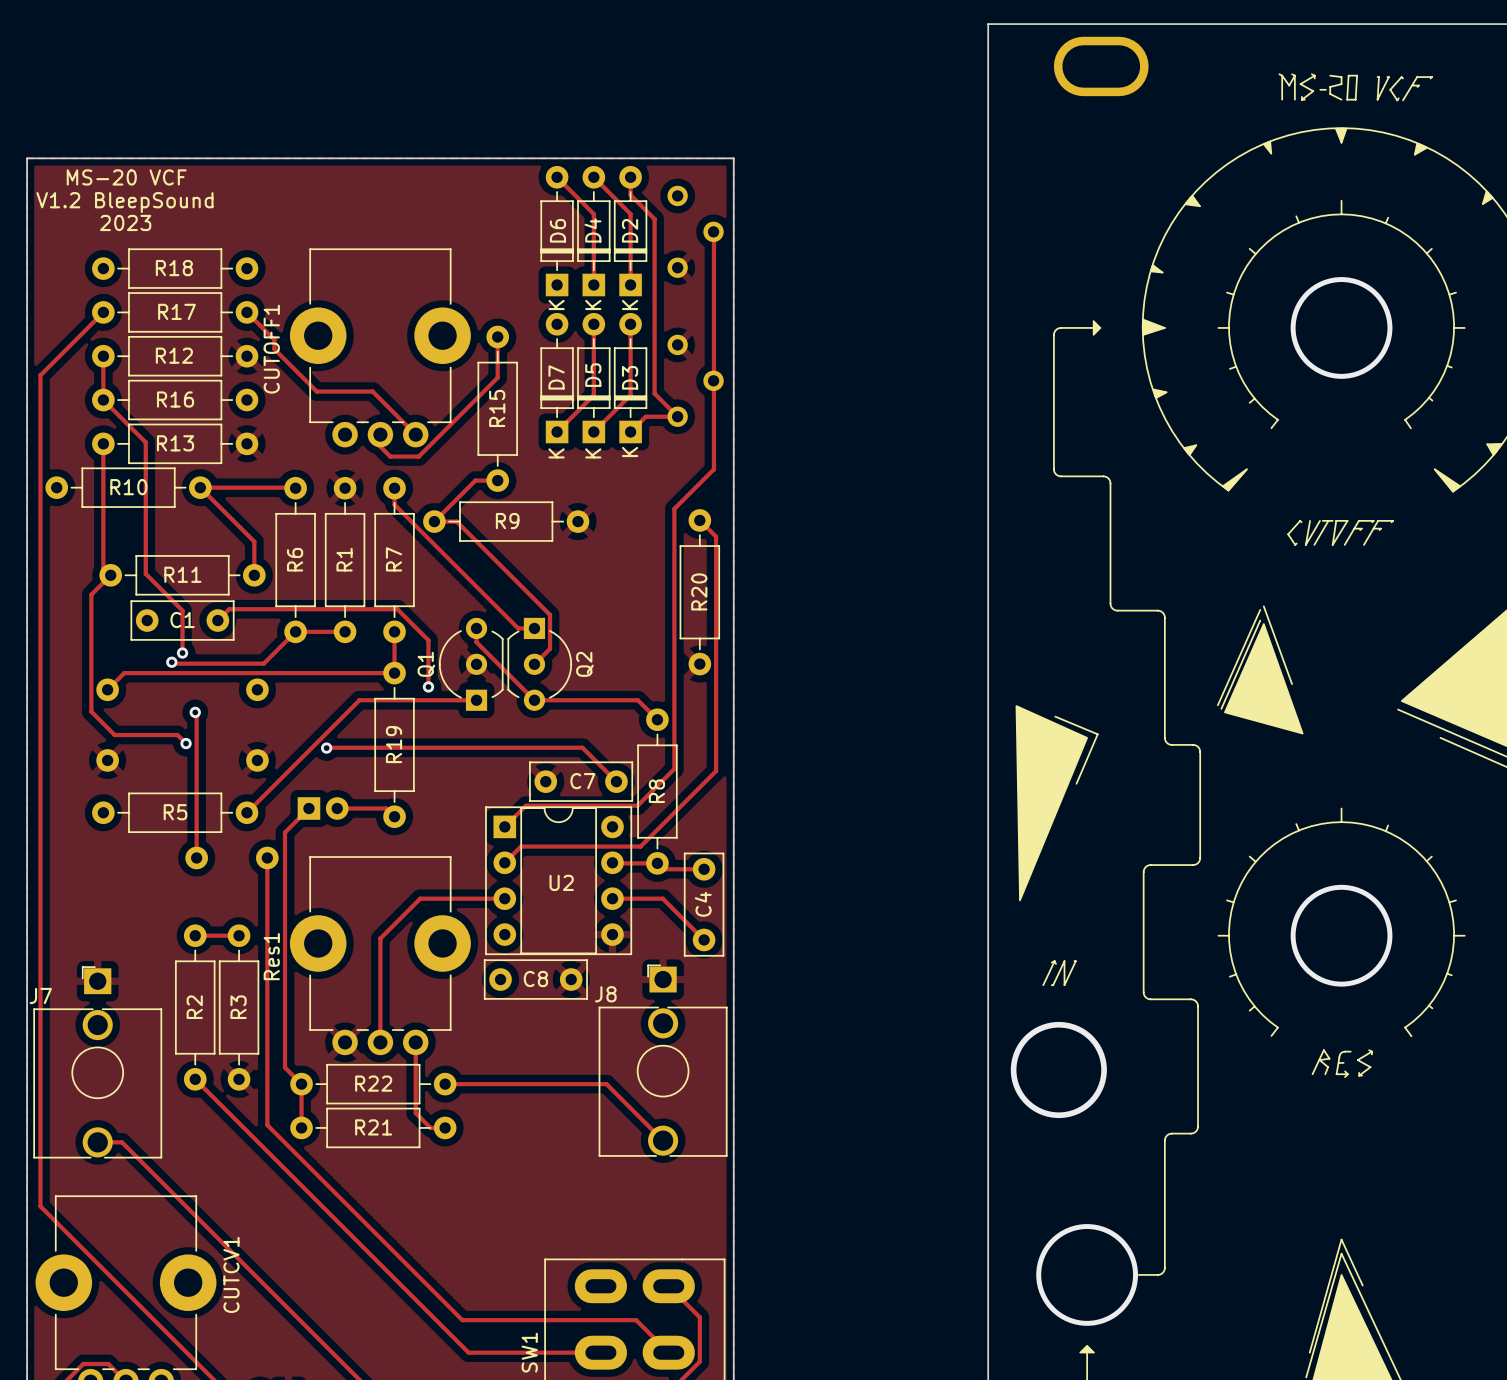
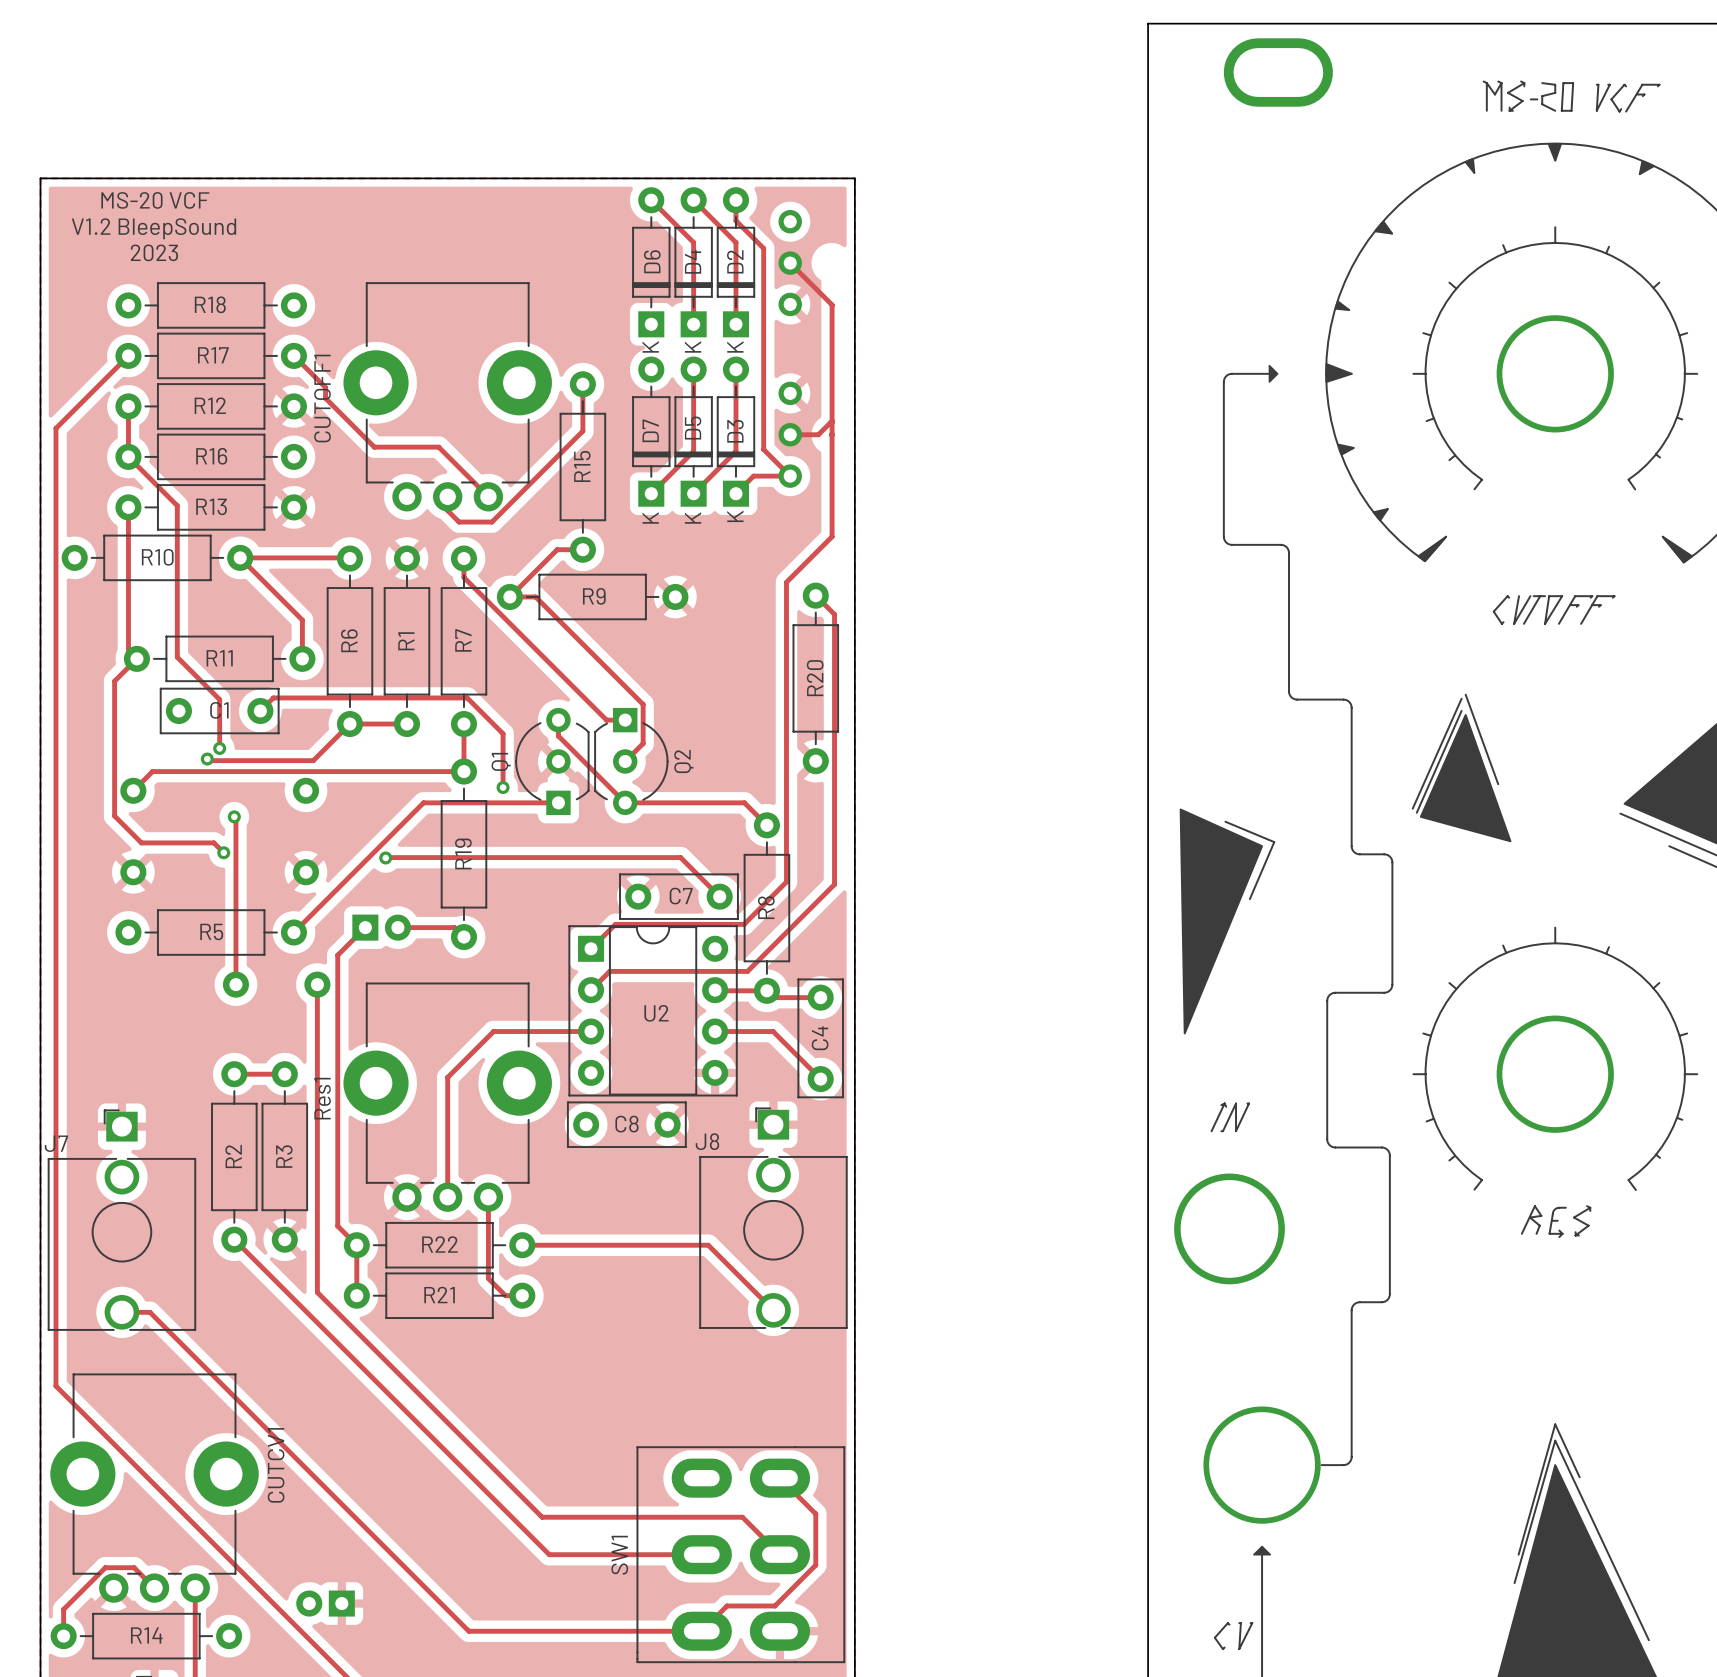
part: none -> (790, 263)
part: (695, 231) -> none
track: (713, 231) (713, 268) -> (790, 263) (832, 304)
track: none -> (832, 421) (818, 434) (790, 434)
part: none -> (790, 434)
part: (695, 380) -> none

